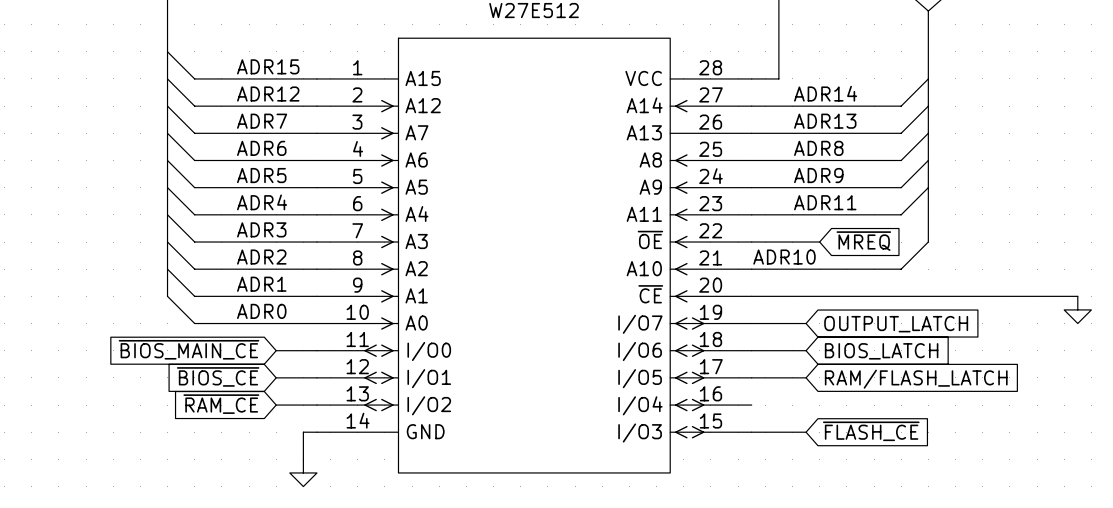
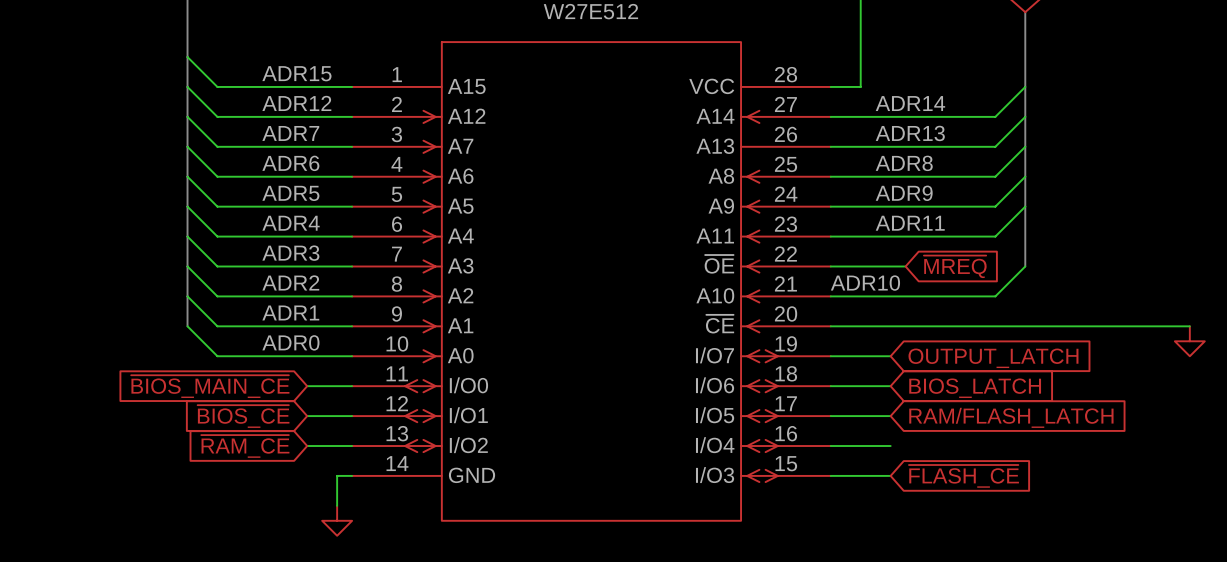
wire: none -> (830, 446) (890, 446)

